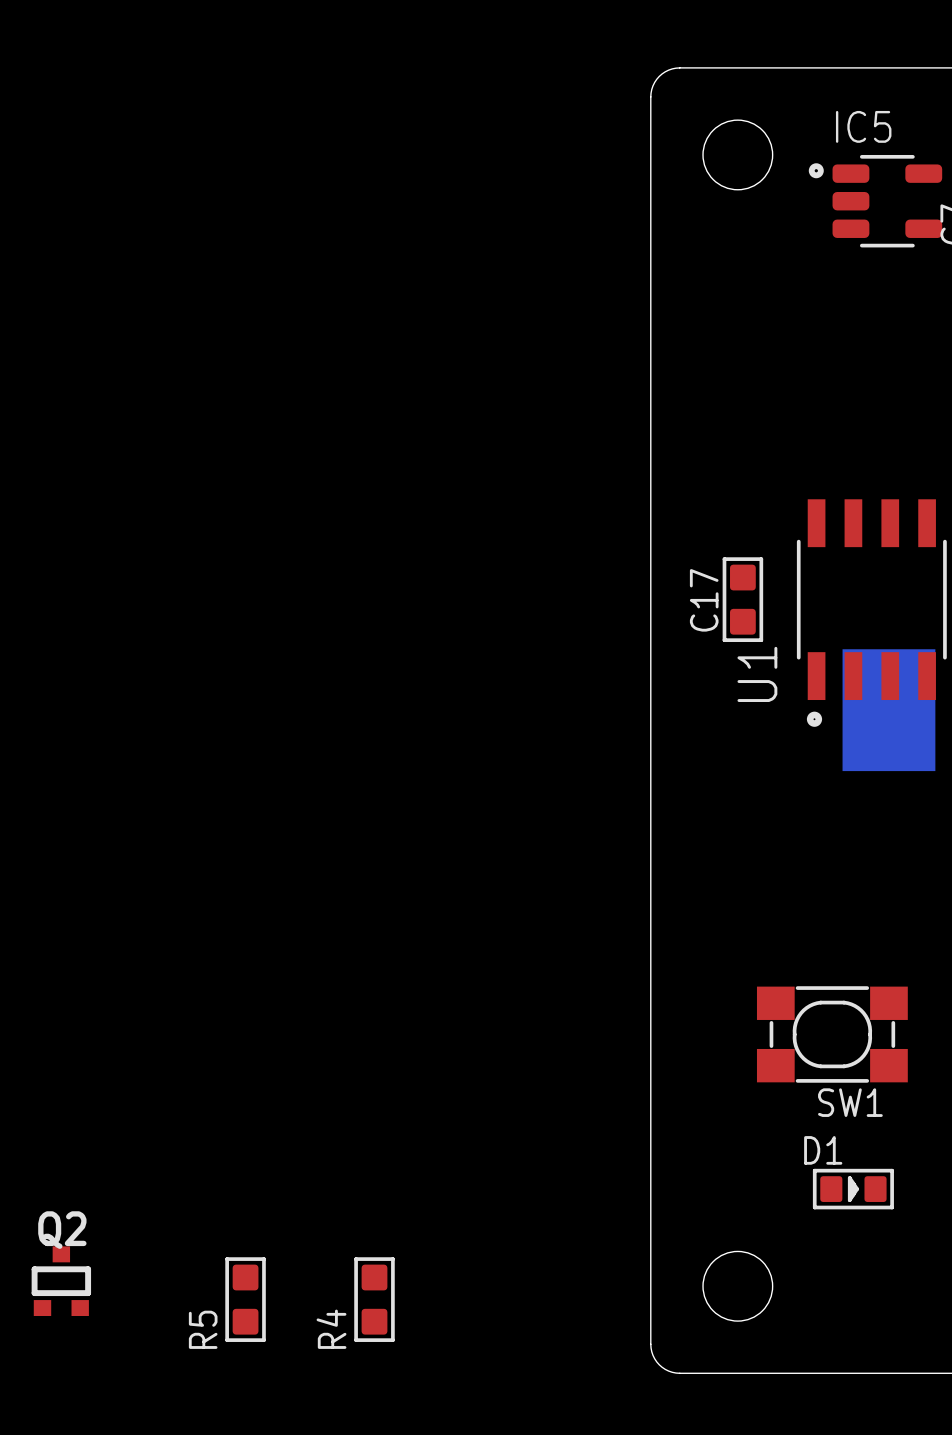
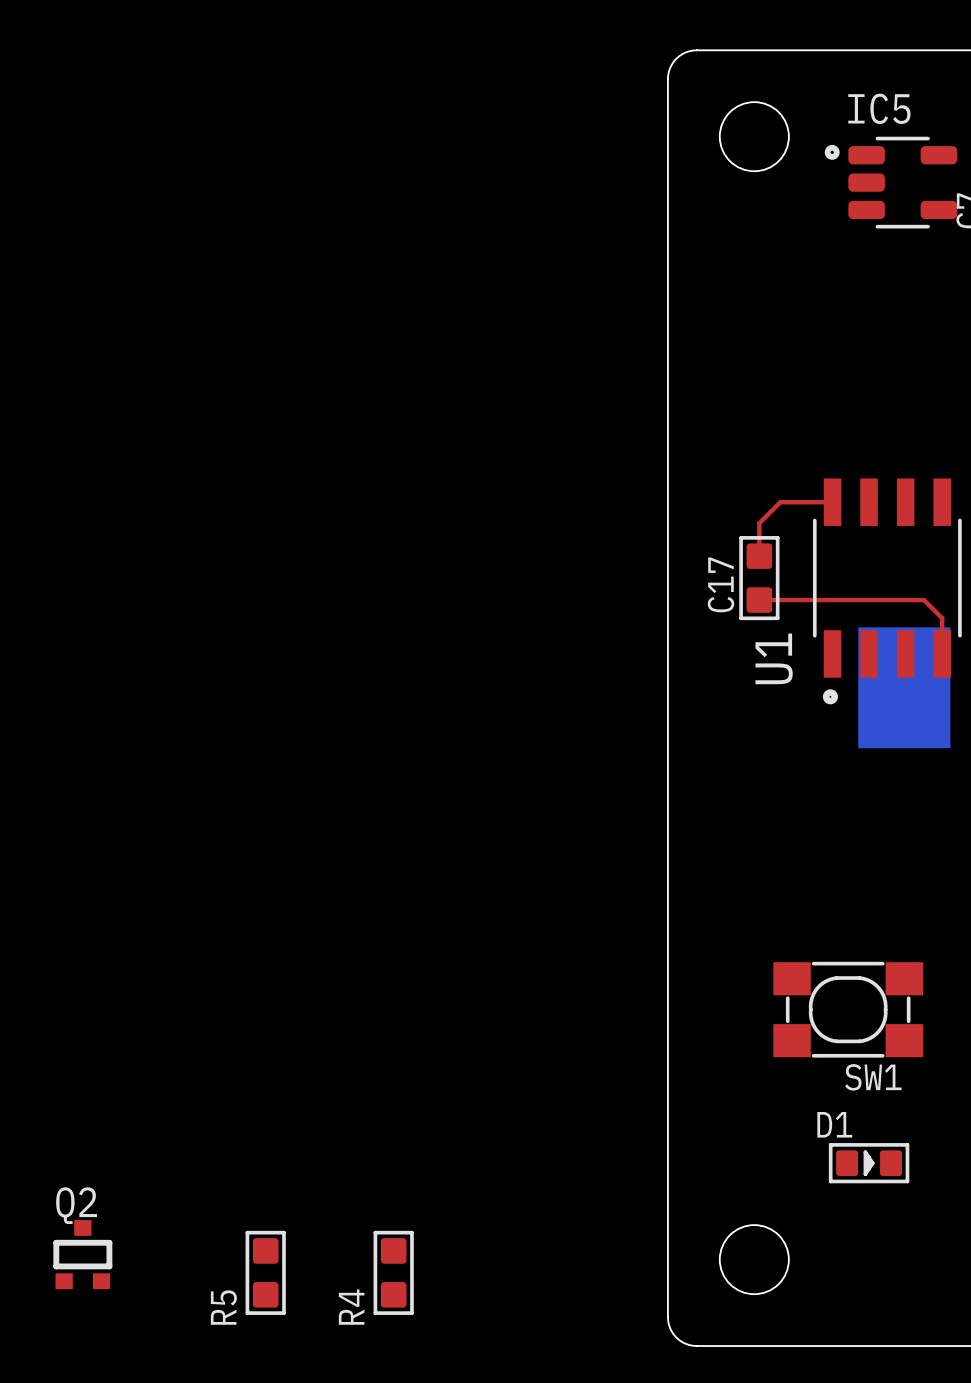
top track: none -> (832, 502) (780, 502) (759, 523) (759, 556)
top track: none -> (759, 600) (923, 600) (942, 618) (942, 653)

